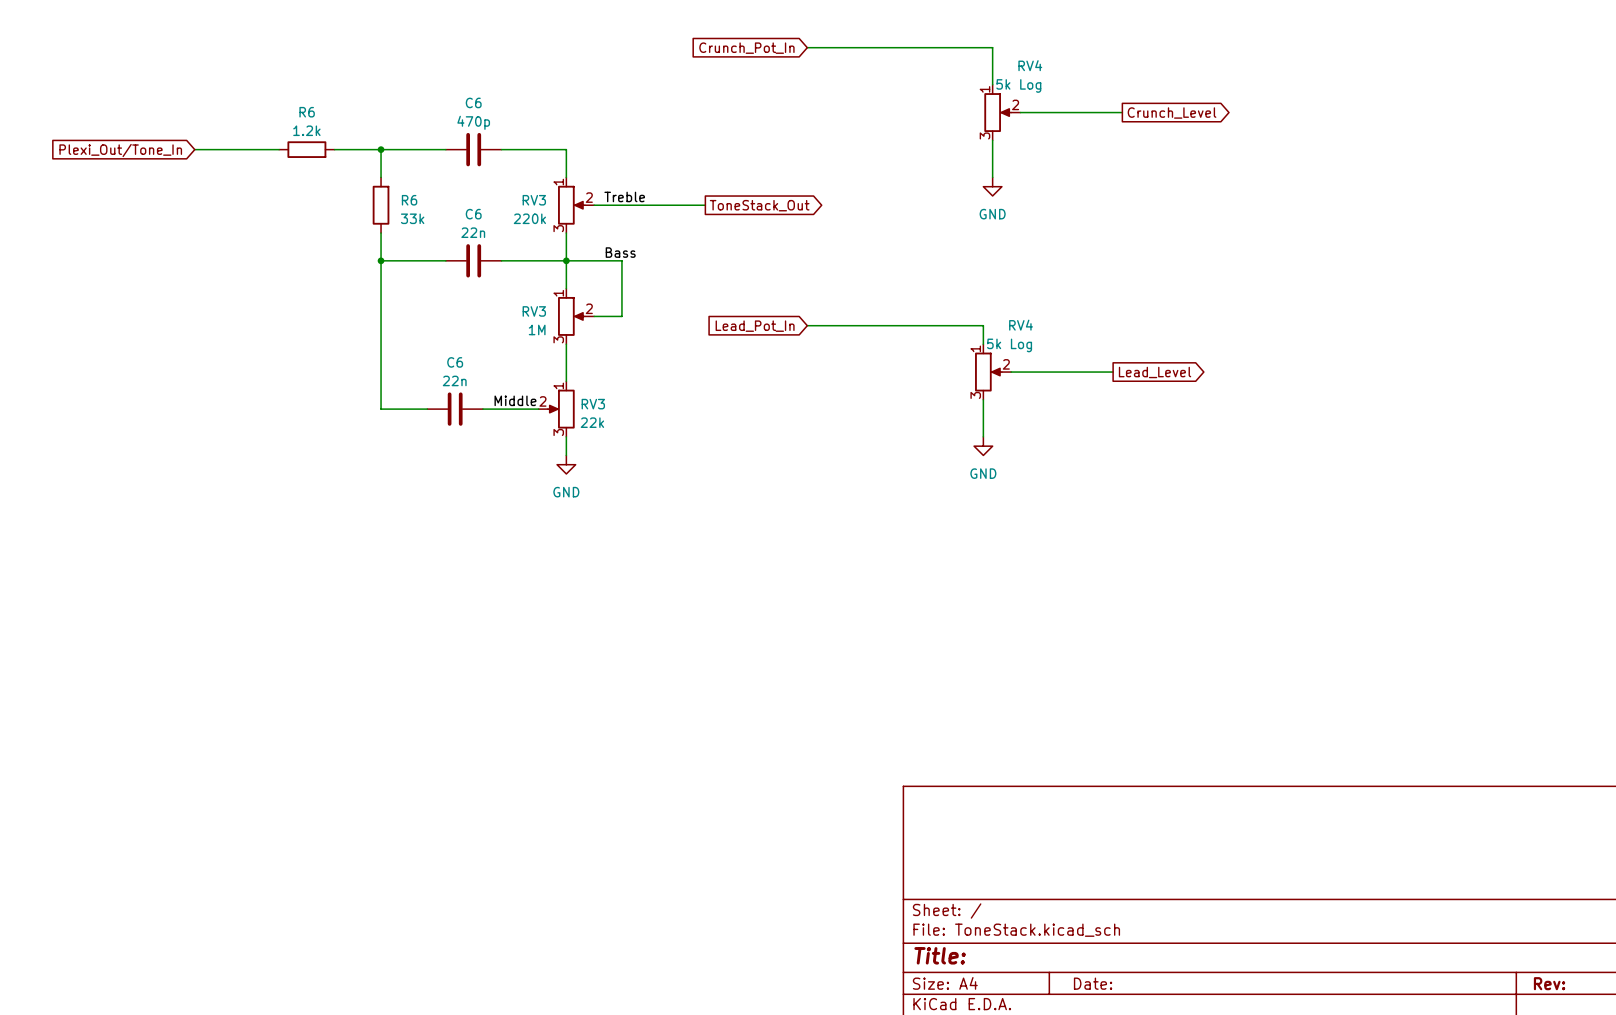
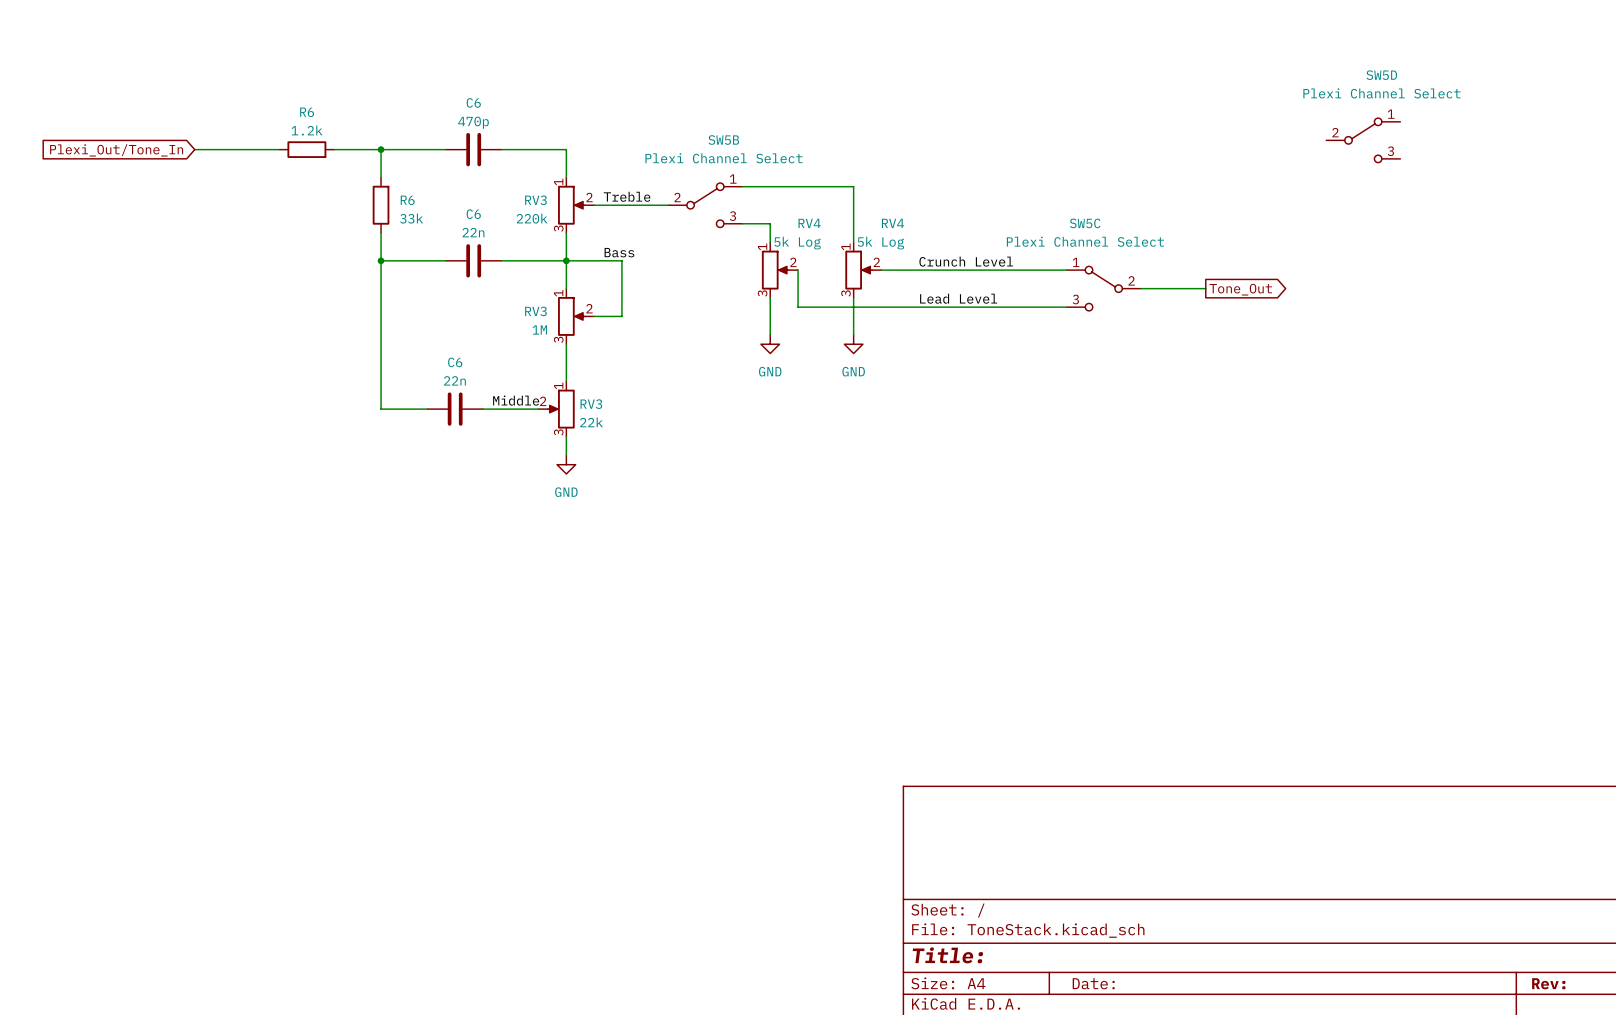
wire: (807, 47) (992, 47) (992, 84) -> none
global label: Crunch_Pot_In (746, 48) -> none
RV4: 5k Log (1002, 112) -> none
wire: (1020, 112) (1122, 112) -> none
global label: Crunch_Level (1172, 113) -> none
wire: (992, 140) (992, 177) -> none
SW5D: none -> Plexi Channel Select (1363, 140)
wire: none -> (742, 186) (853, 186) (853, 242)
power symbol: GND (992, 186) -> none
SW5B: none -> Plexi Channel Select (705, 205)
global label: ToneStack_Out (759, 205) -> none
wire: none -> (742, 223) (770, 223) (770, 242)
label: none -> Crunch Level (966, 261)
RV4: none -> 5k Log (779, 270)
wire: none -> (798, 270) (798, 307) (1066, 307)
RV4: none -> 5k Log (863, 270)
wire: none -> (881, 270) (1066, 270)
SW5C: none -> Plexi Channel Select (1103, 288)
wire: none -> (1140, 288) (1205, 288)
global label: none -> Tone_Out (1240, 289)
wire: none -> (770, 297) (770, 334)
label: none -> Lead Level (958, 298)
wire: (807, 325) (983, 325) (983, 344) -> none
global label: Lead_Pot_In (755, 326) -> none
power symbol: none -> GND (770, 344)
power symbol: none -> GND (853, 344)
RV4: 5k Log (993, 372) -> none
wire: (1011, 372) (1113, 372) -> none
global label: Lead_Level (1155, 372) -> none
wire: (983, 399) (983, 436) -> (853, 297) (853, 334)
power symbol: GND (983, 446) -> none

